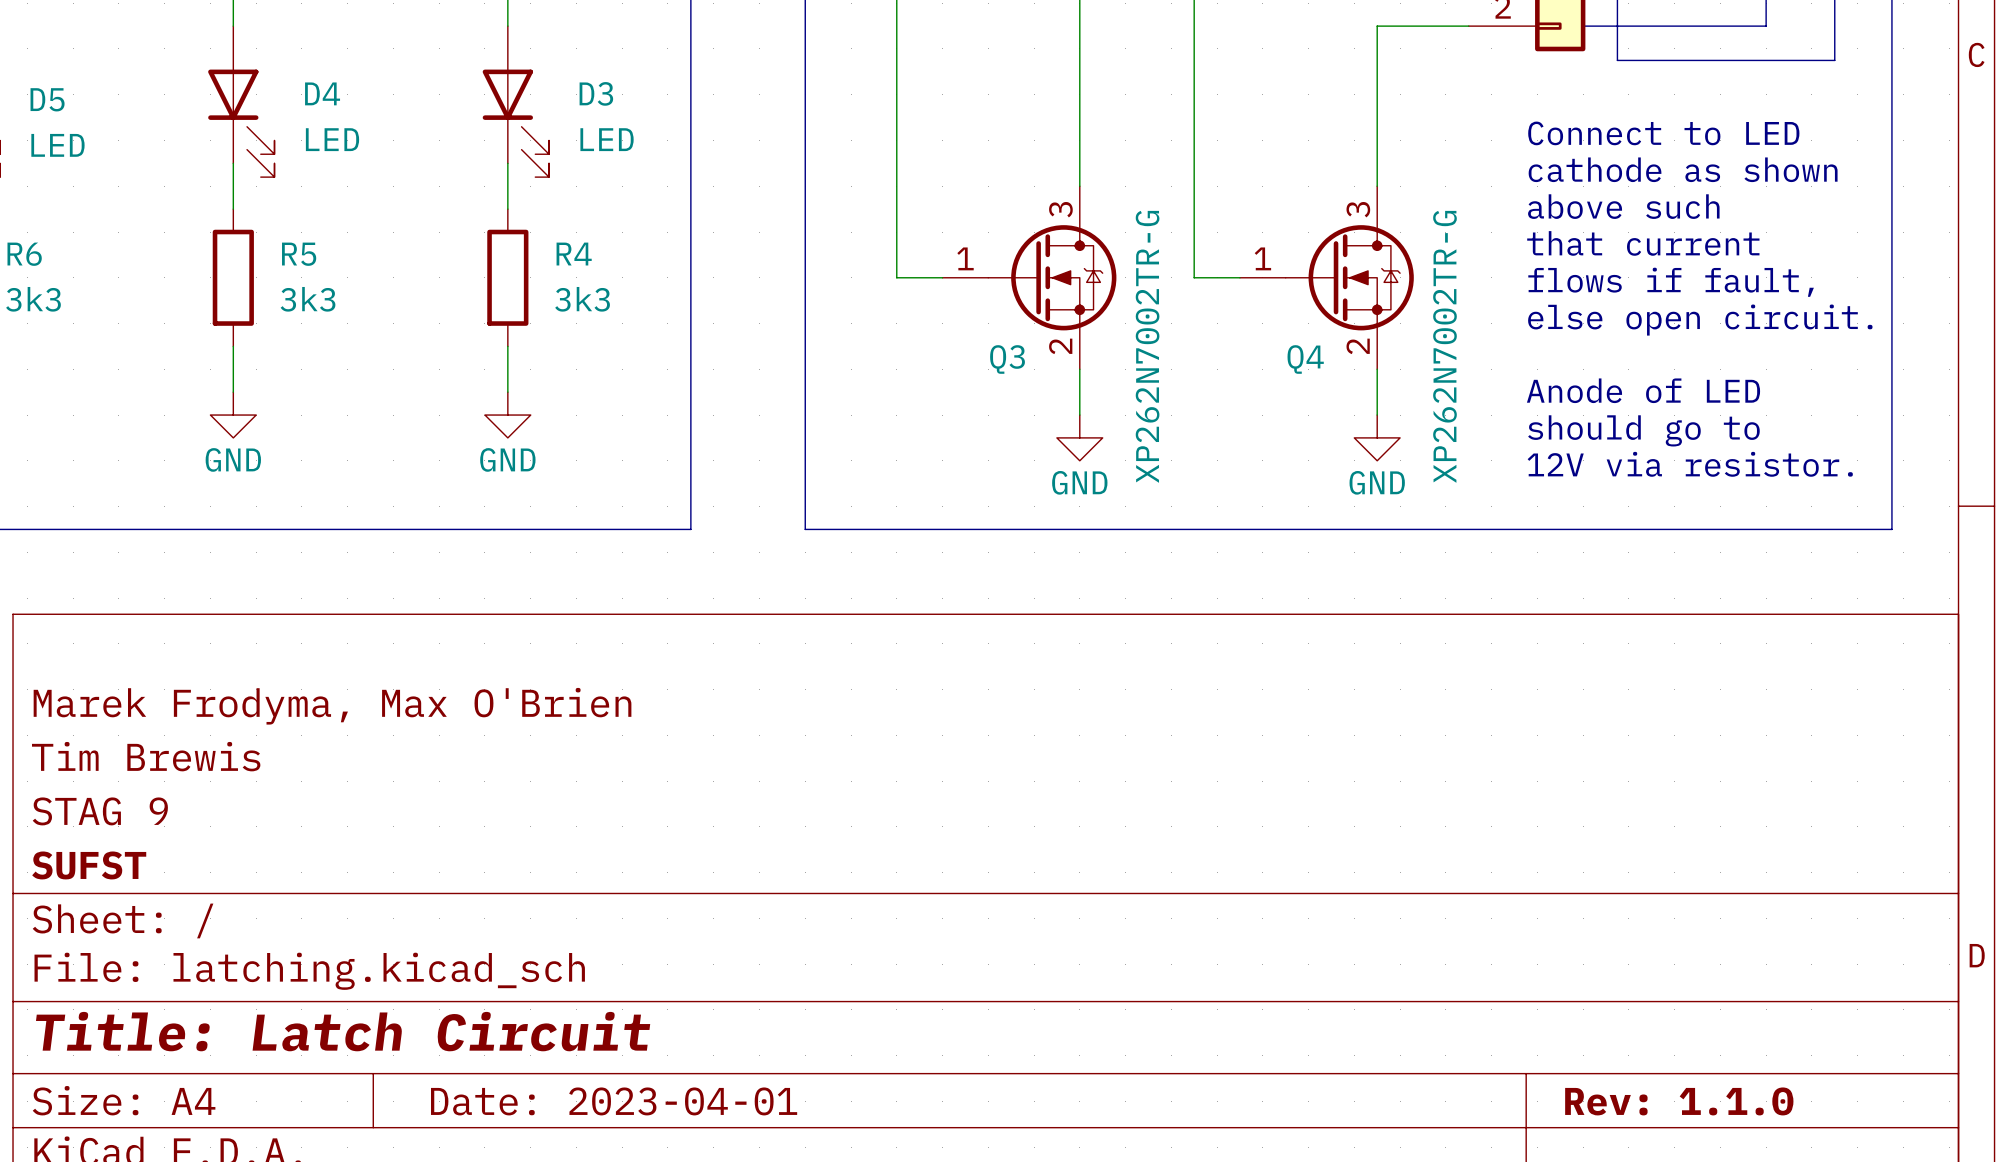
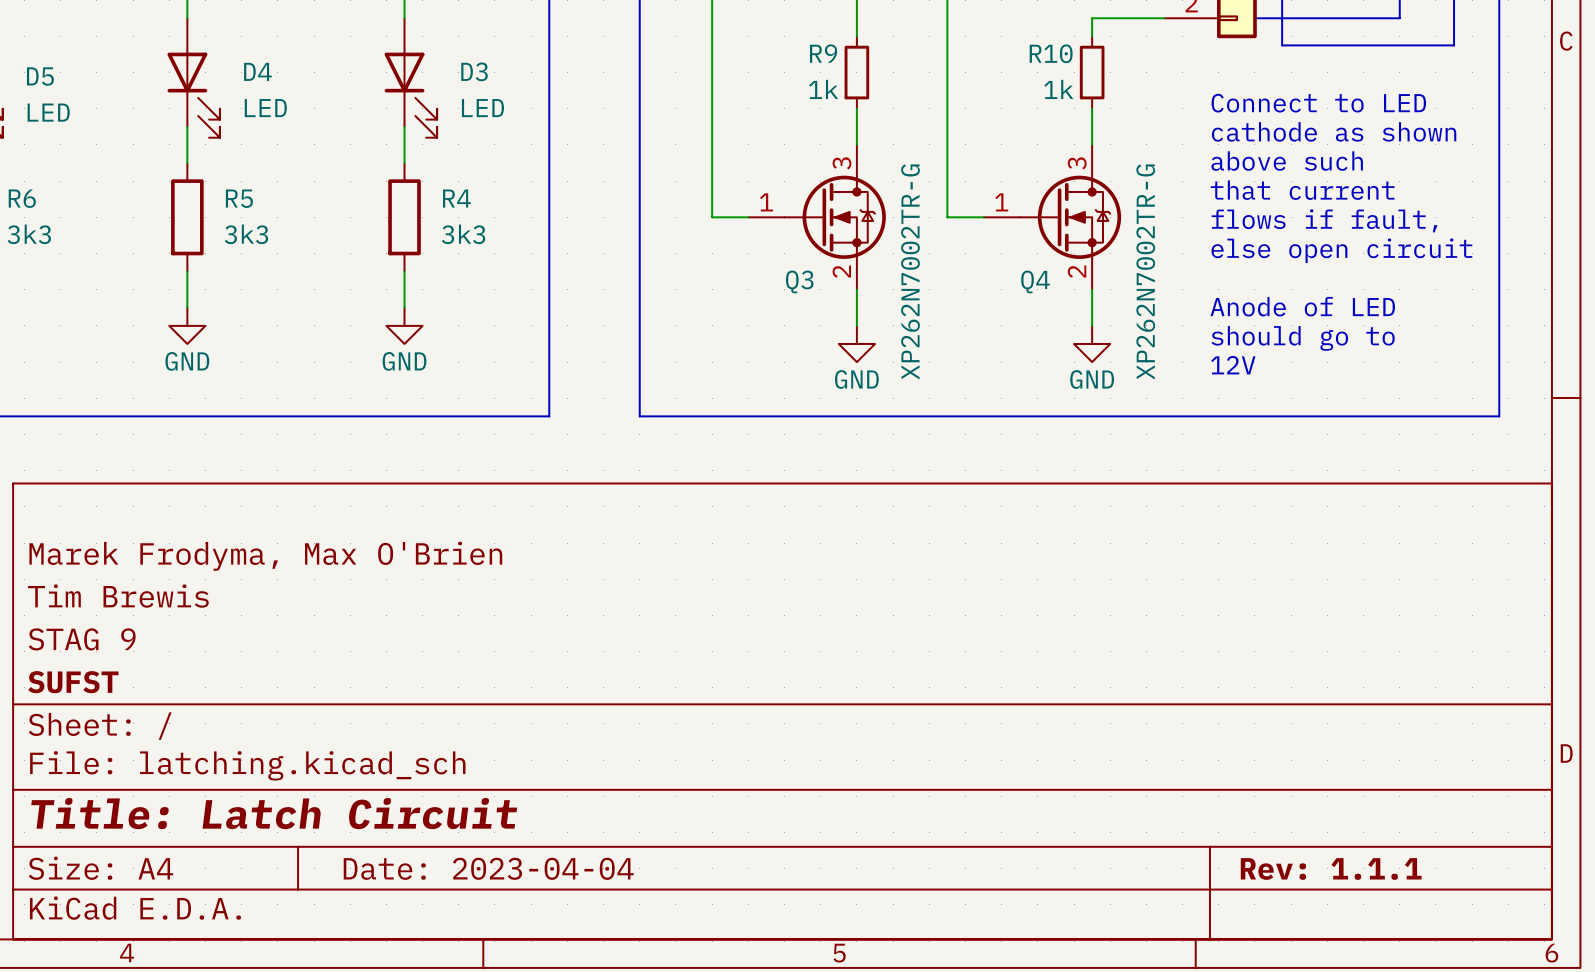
wire: (1079, 48) (1079, 140) -> none
wire: (1377, 48) (1377, 140) -> none
R9: none -> 1k (856, 72)
R10: none -> 1k (1092, 72)
text: else open circuit. (1700, 320) -> else open circuit (1341, 250)
text: 12V via resistor. (1690, 464) -> 12V (1233, 365)
title block: Date: 2023-04-01 (614, 1101) -> Date: 2023-04-04 (488, 868)
title block: Rev: 1.1.0 (1679, 1101) -> Rev: 1.1.1 (1331, 868)

